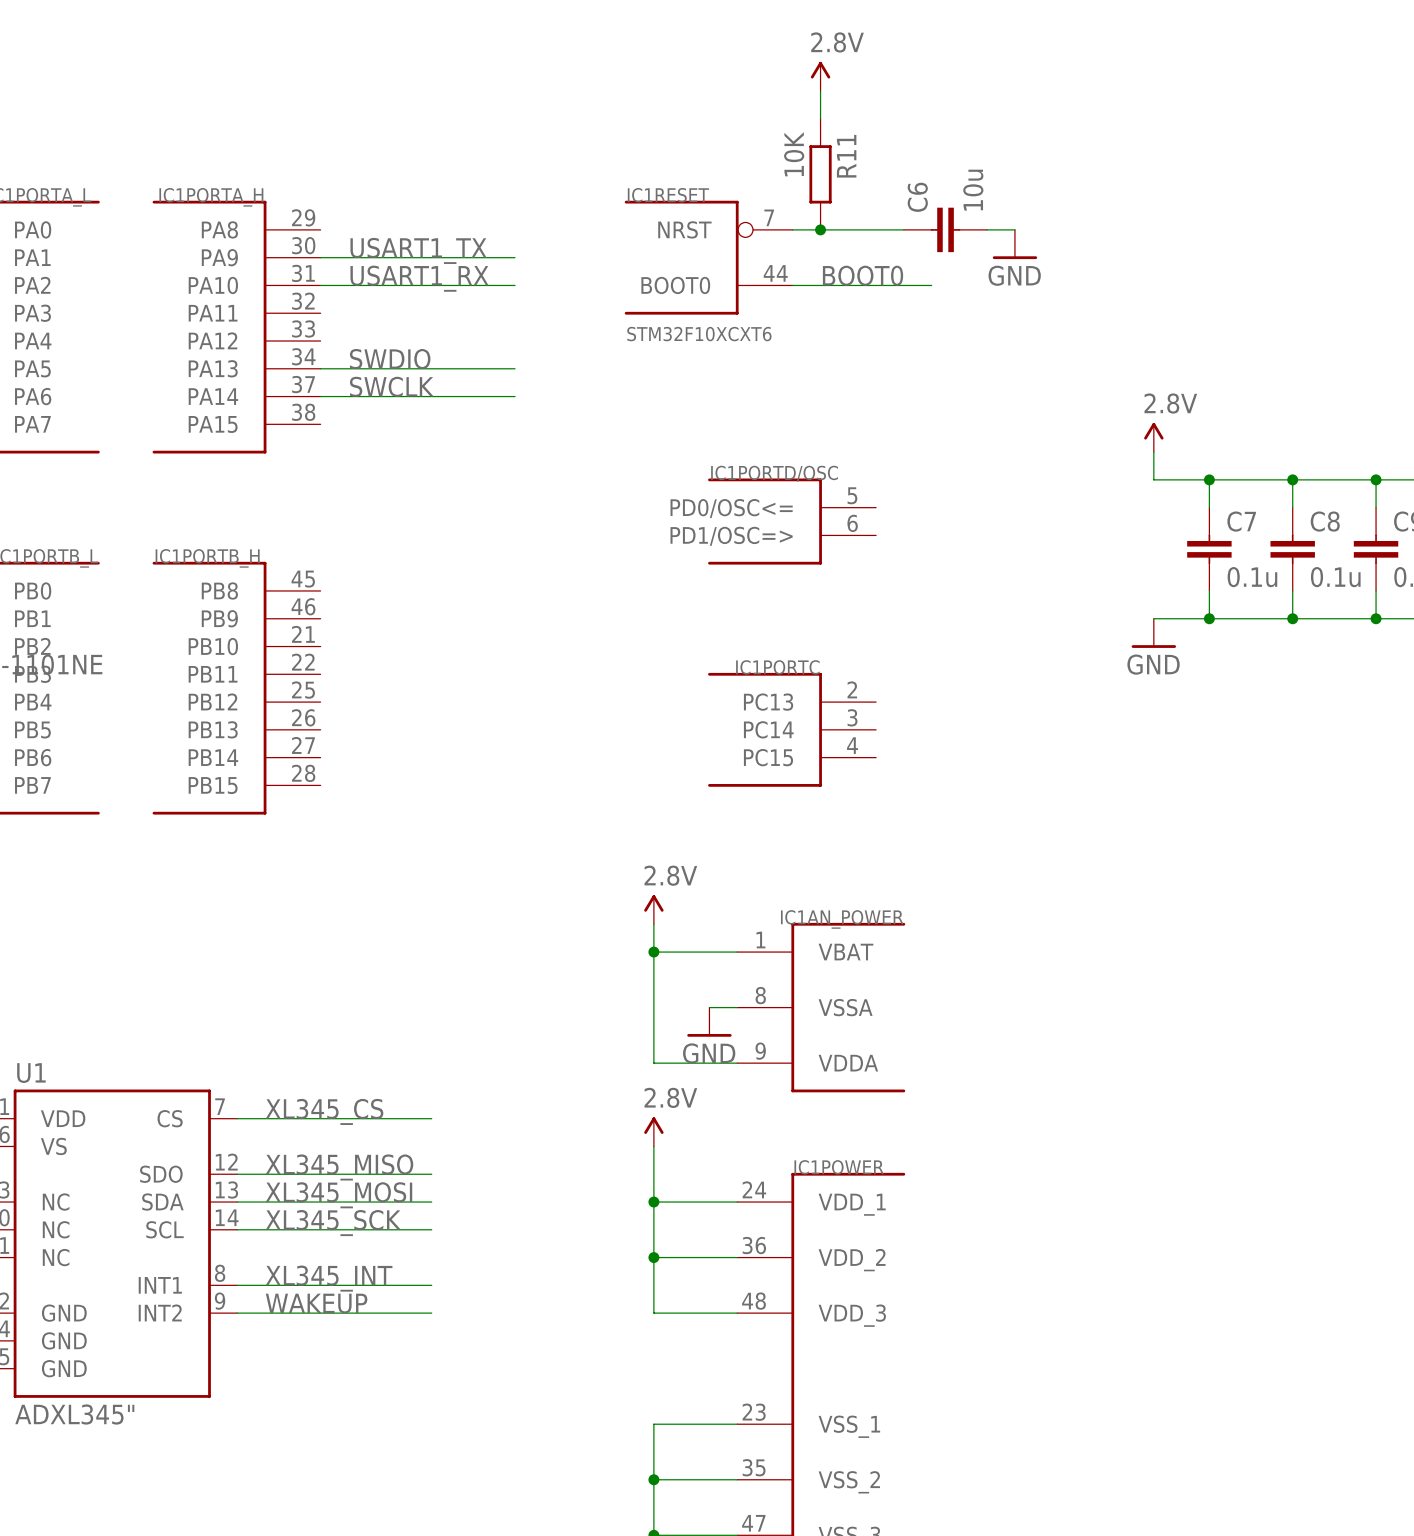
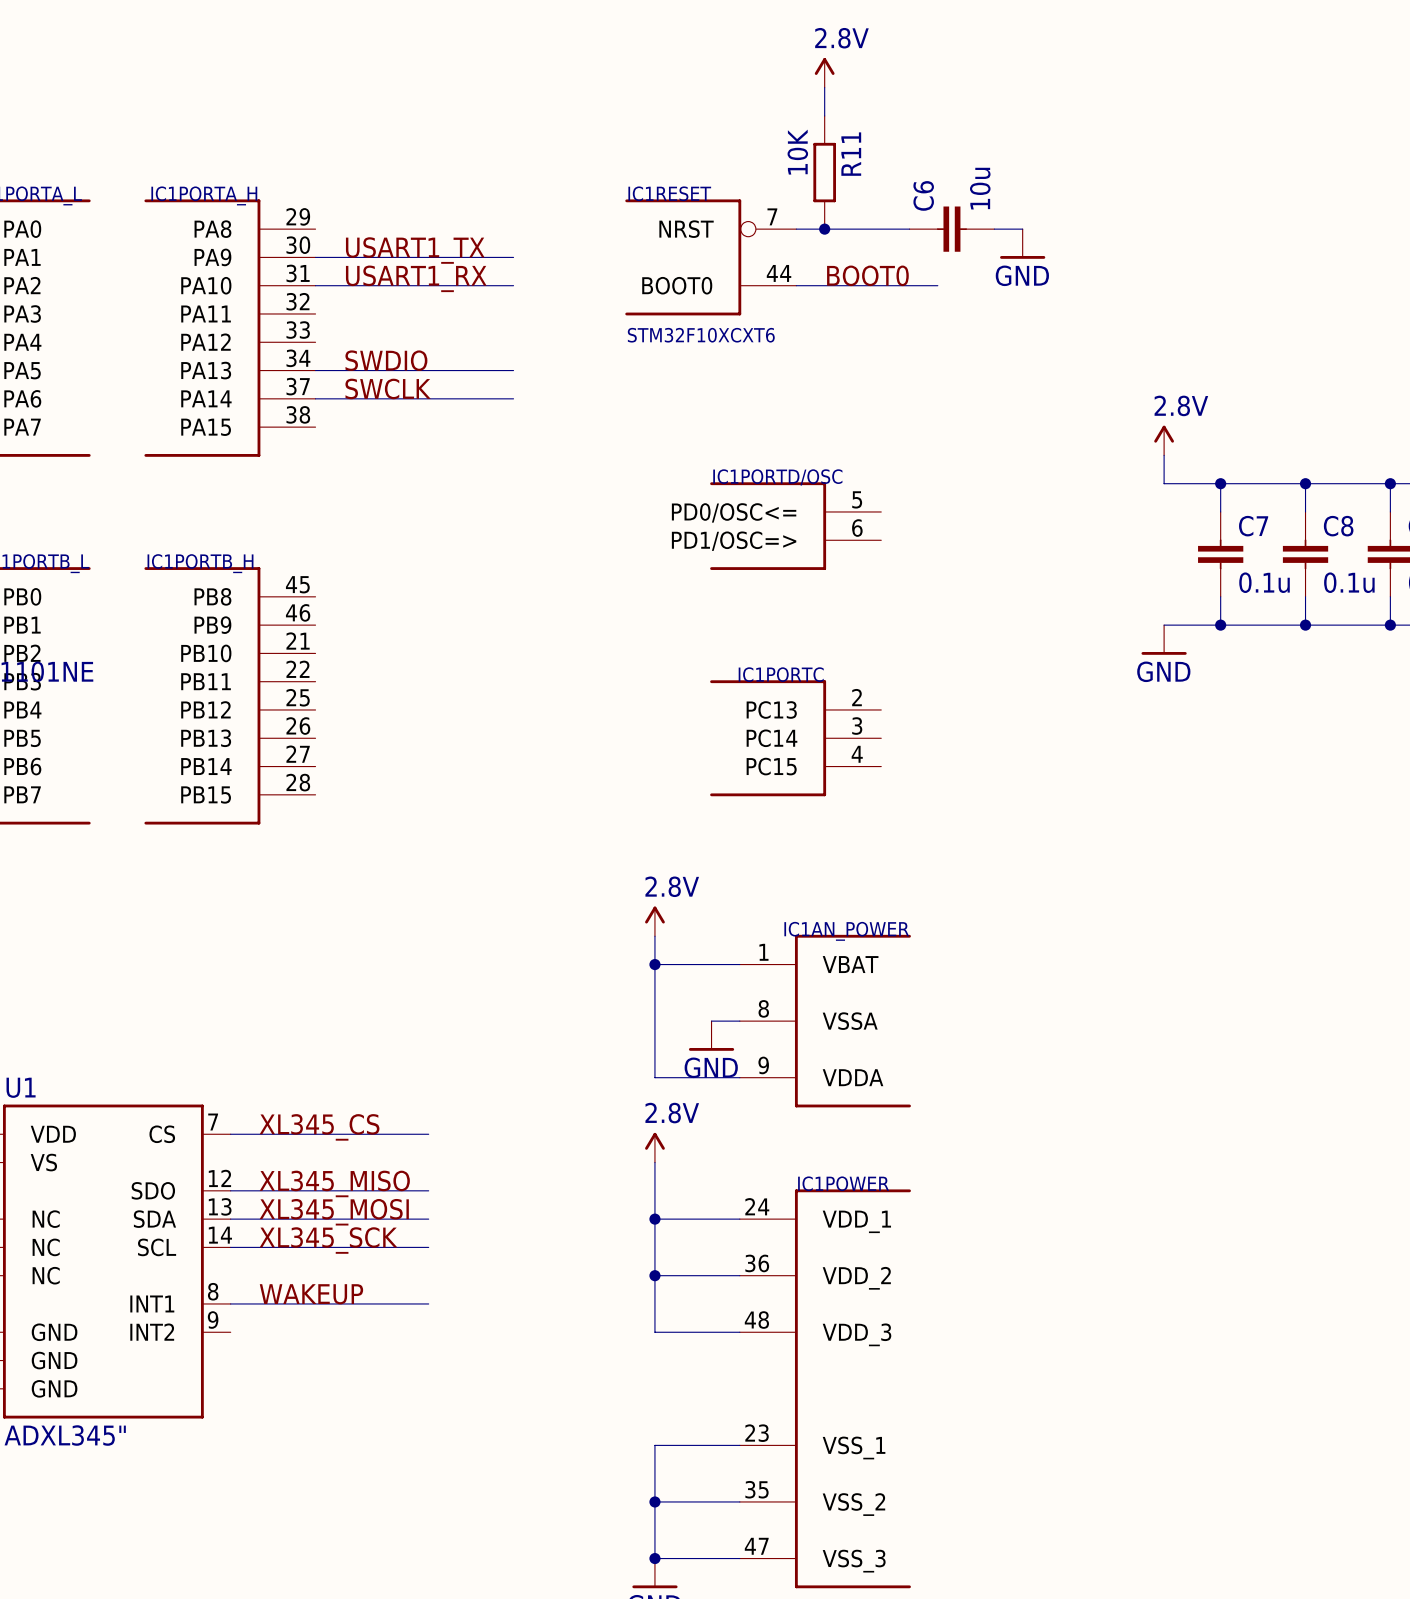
label: XL345_INT (329, 1278) -> WAKEUP (311, 1294)
label: WAKEUP (316, 1303) -> none
wire: (237, 1313) (431, 1313) -> none

